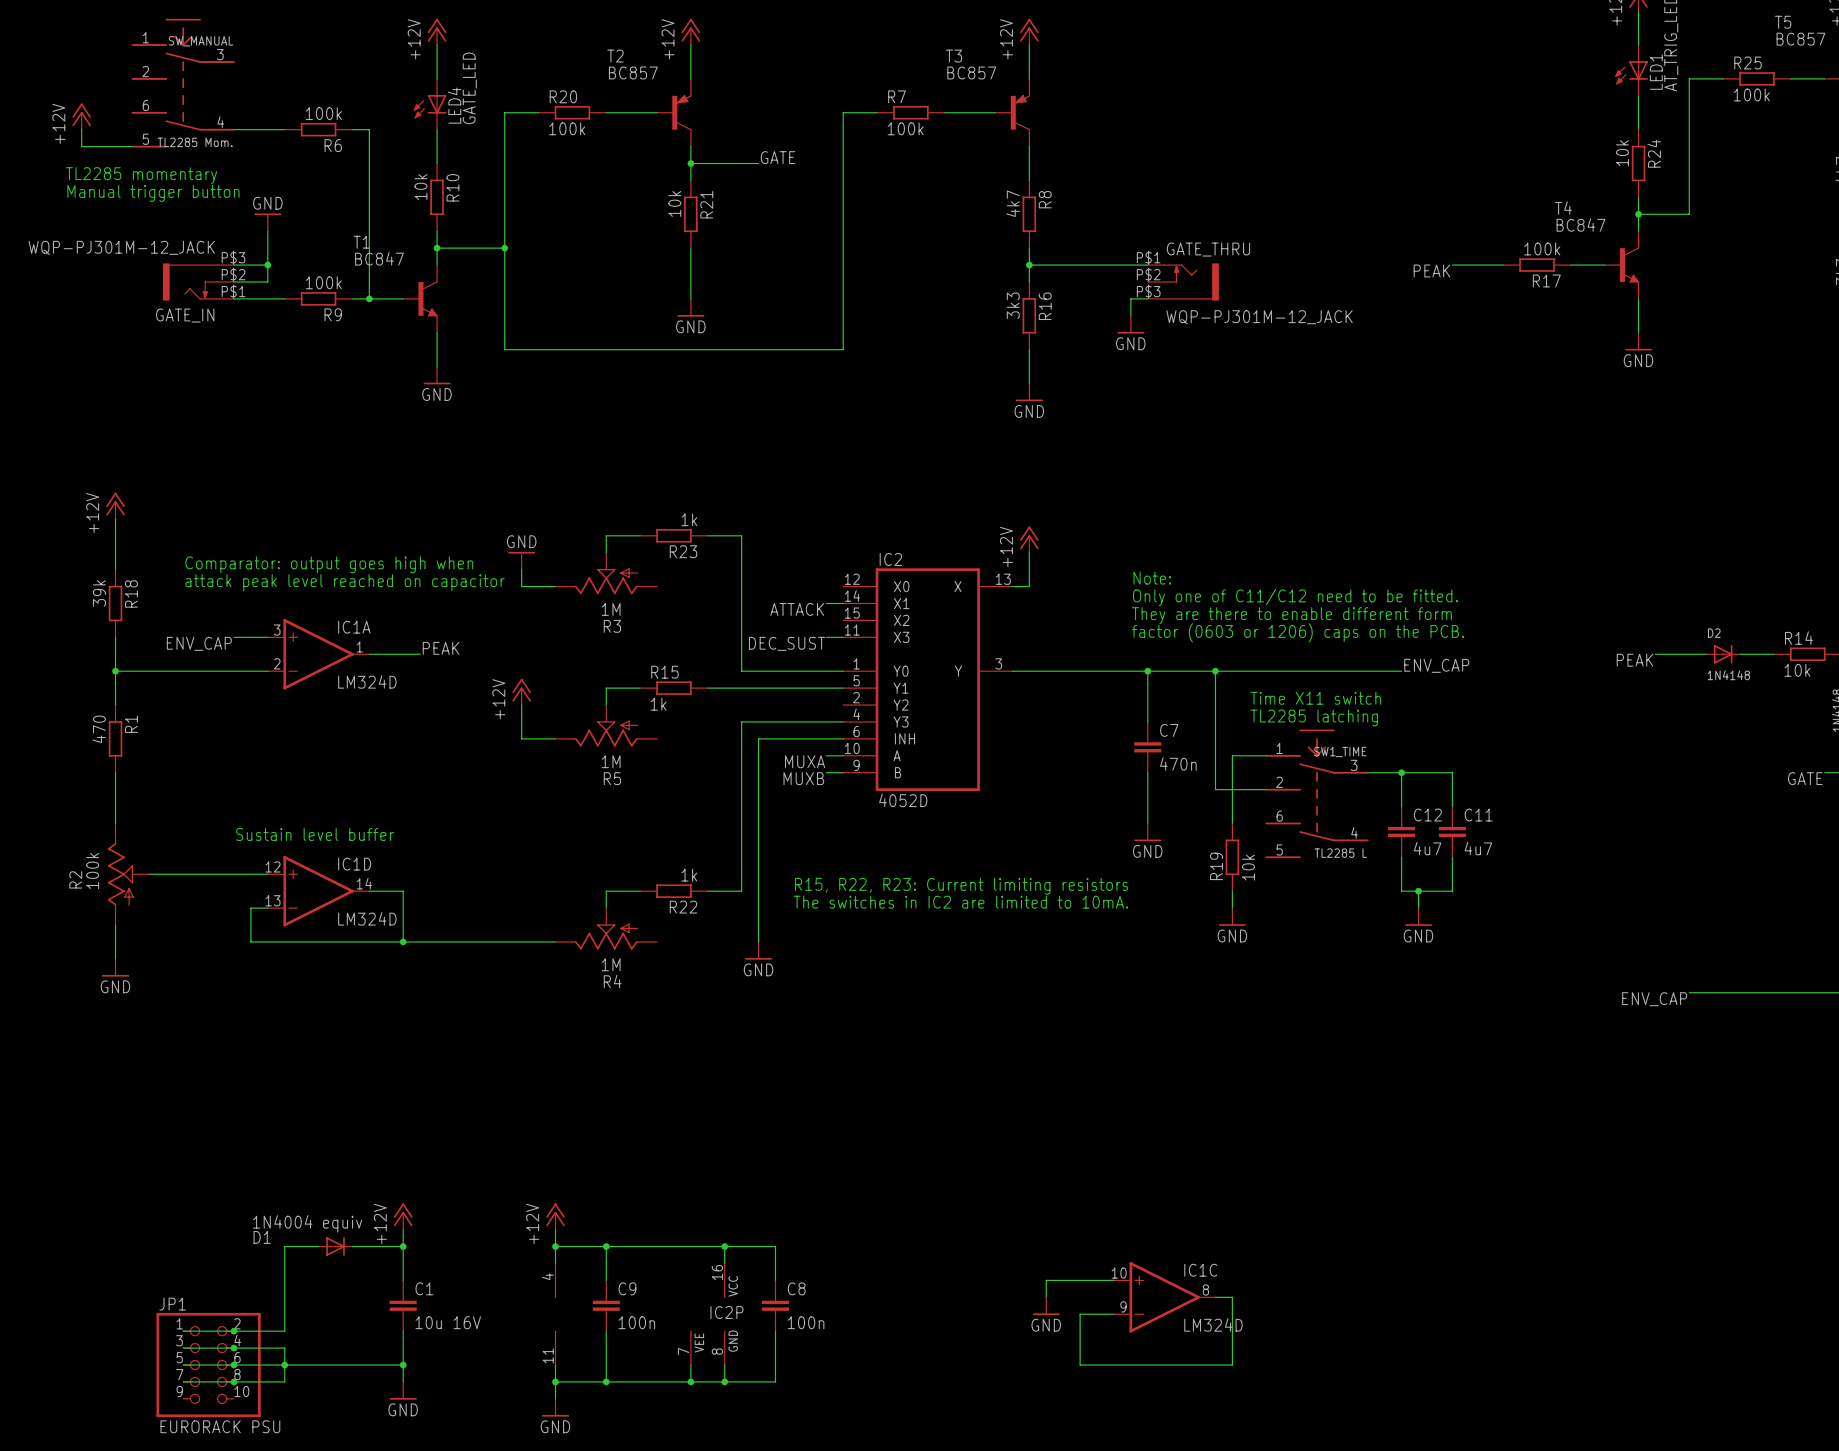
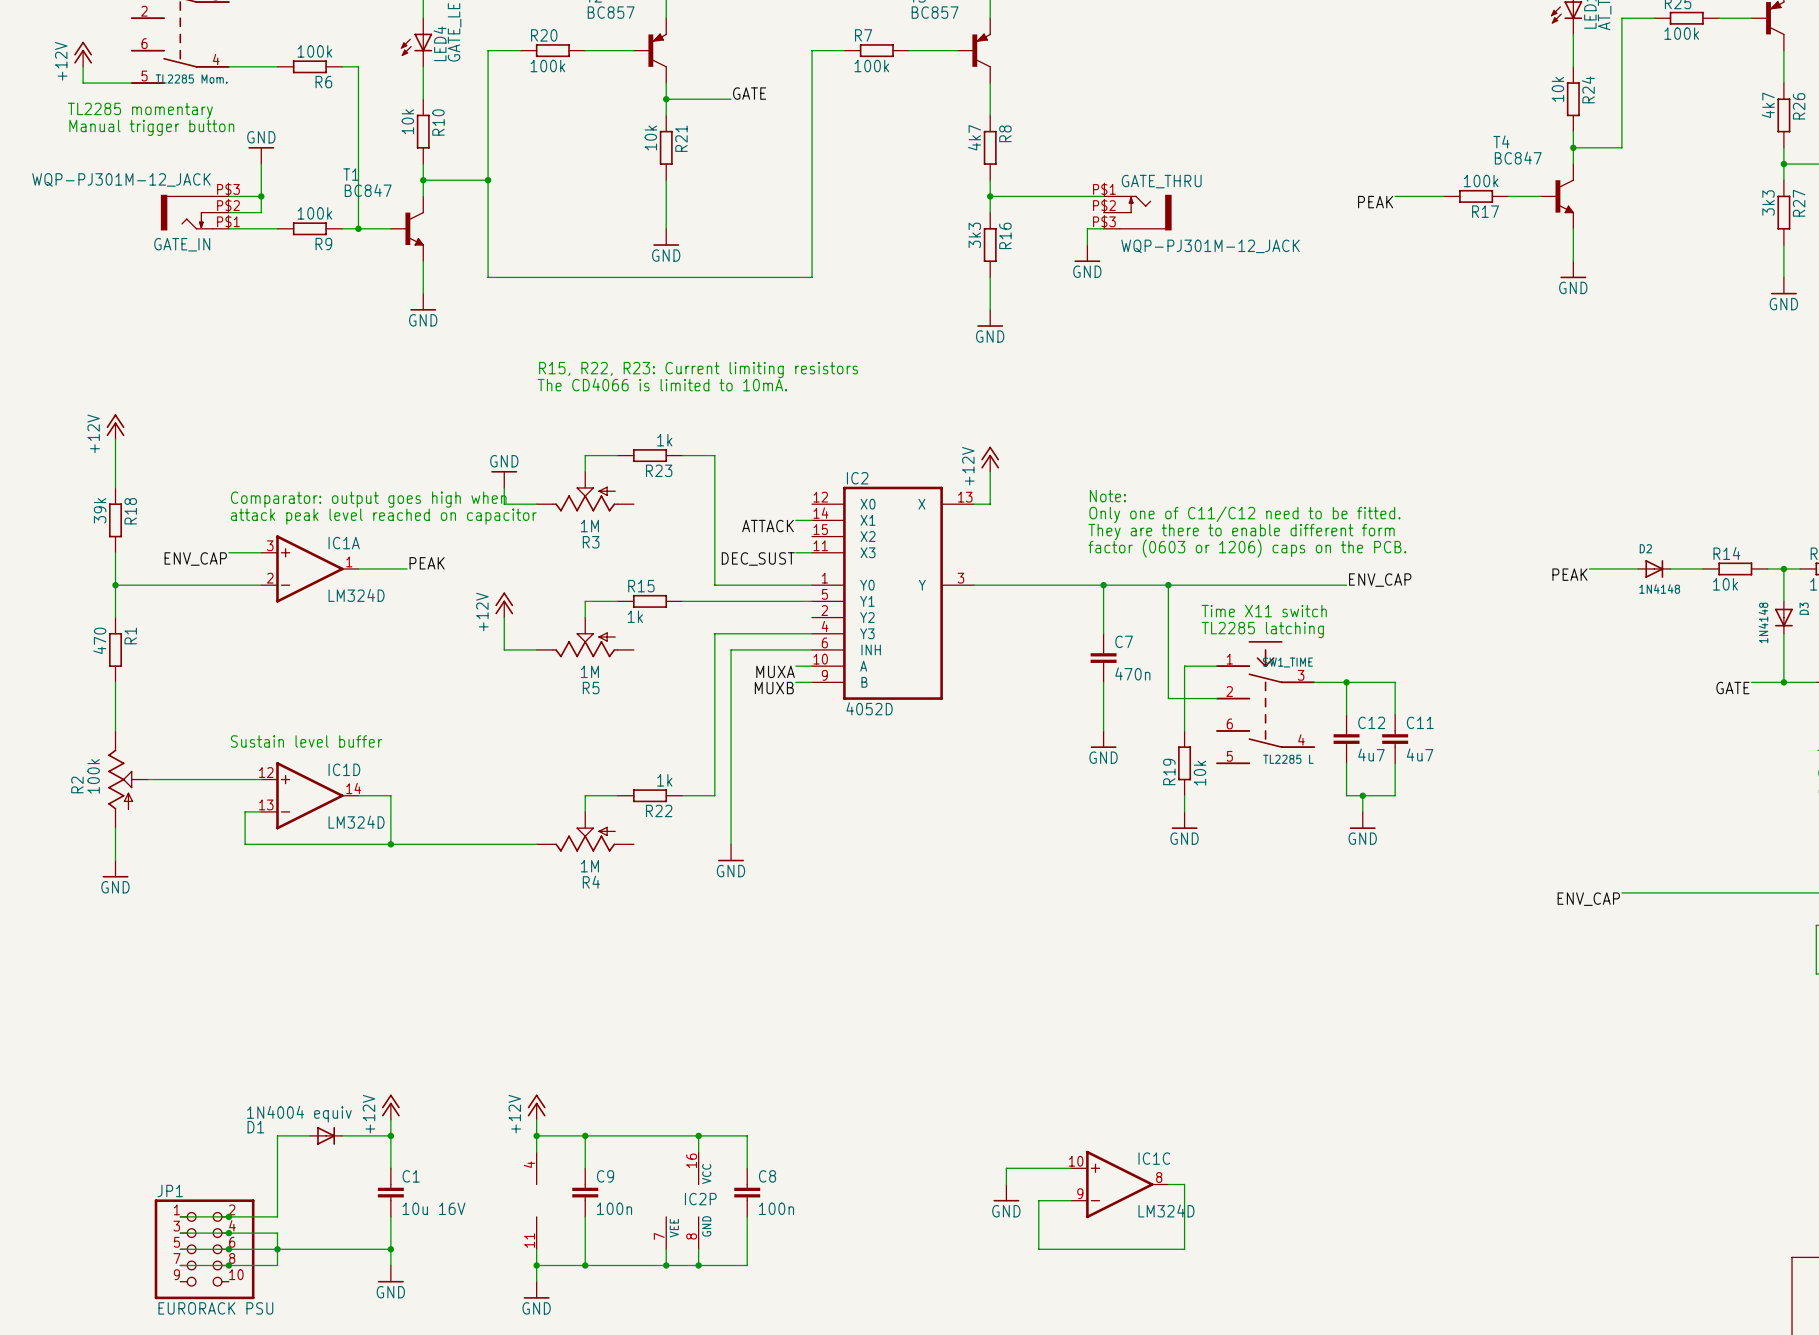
text: none -> R15, R22, R23: Current limiting resistors (698, 370)
text: none -> The CD4066 is limited to 10mA. (662, 384)
text position: Comparator: output goes high when (329, 564) -> Comparator: output goes high when (368, 499)
text position: attack peak level reached on capacitor (345, 582) -> attack peak level reached on capacitor (383, 516)
text: R15, R22, R23: Current limiting resistors (961, 886) -> none
text: The switches in IC2 are limited to 10mA. (960, 902) -> none

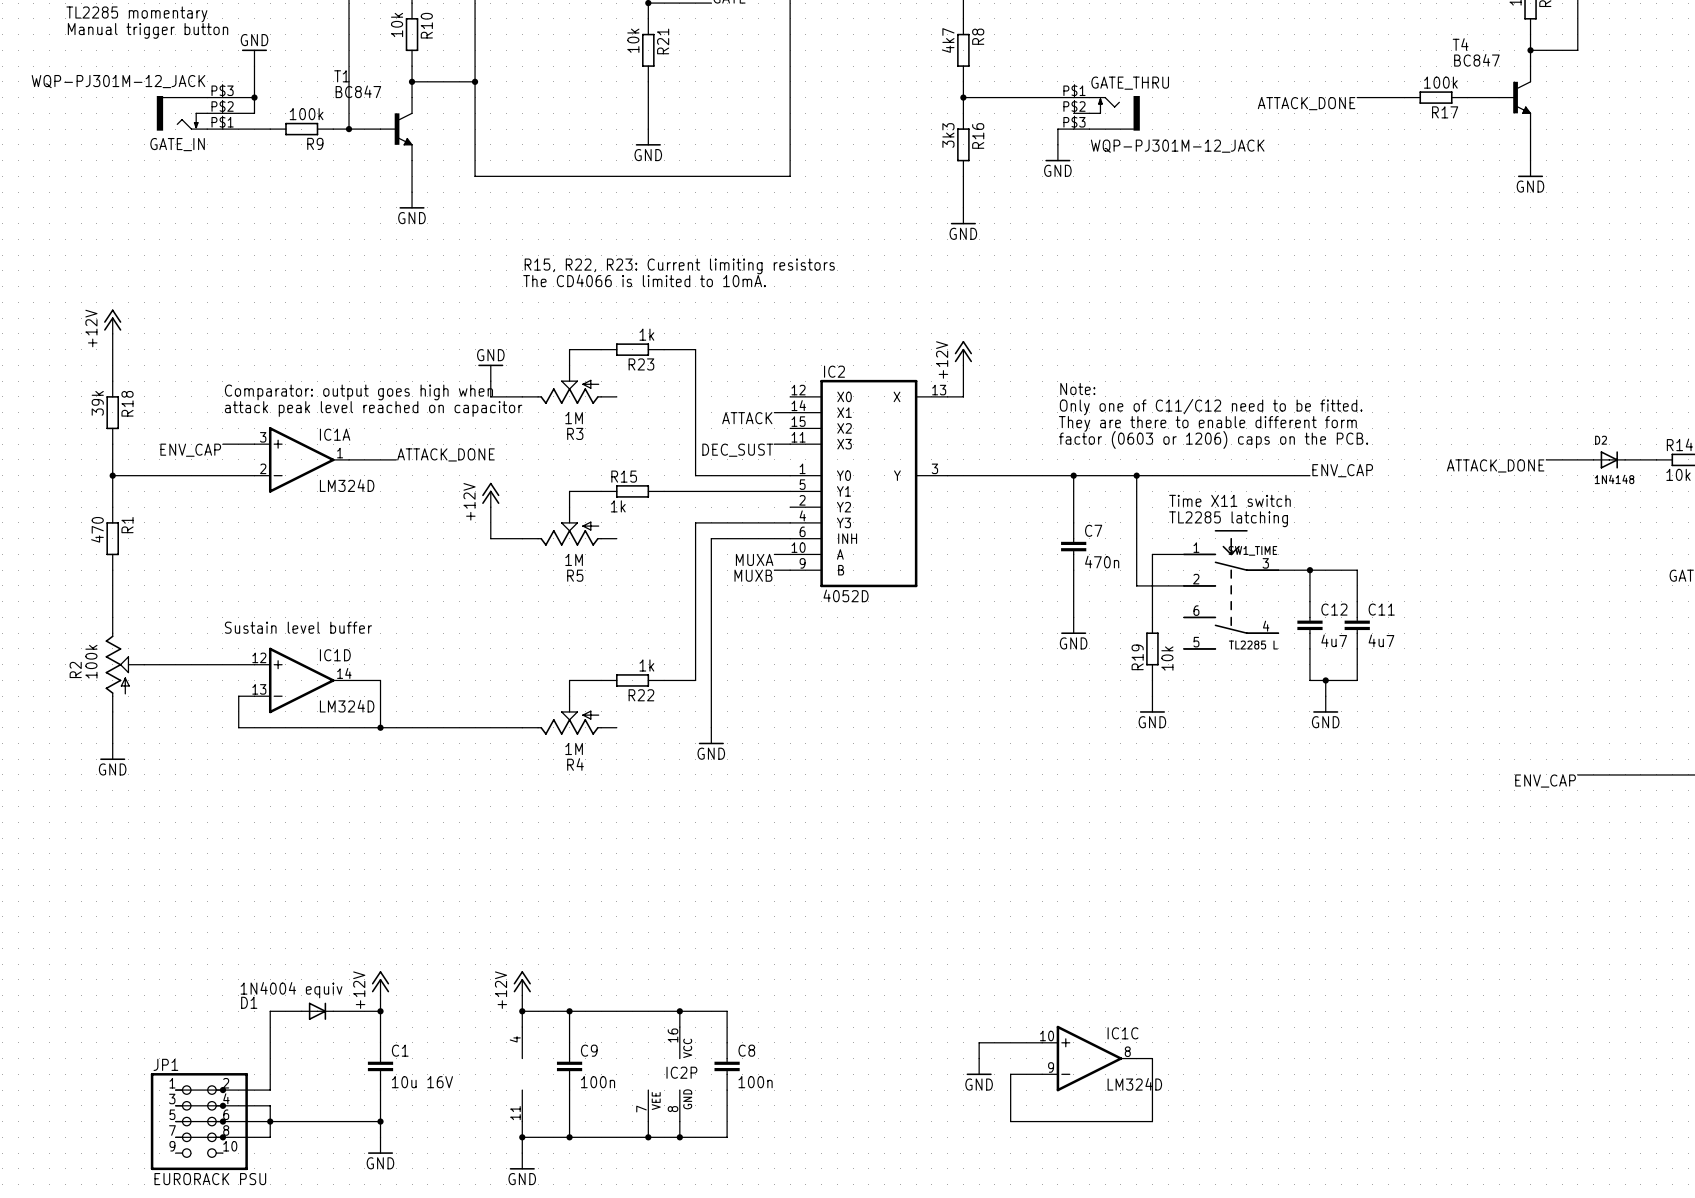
label: PEAK (1375, 202) -> ATTACK_DONE (1306, 103)
label: PEAK (427, 563) -> ATTACK_DONE (445, 454)
label: PEAK (1569, 574) -> ATTACK_DONE (1495, 465)

